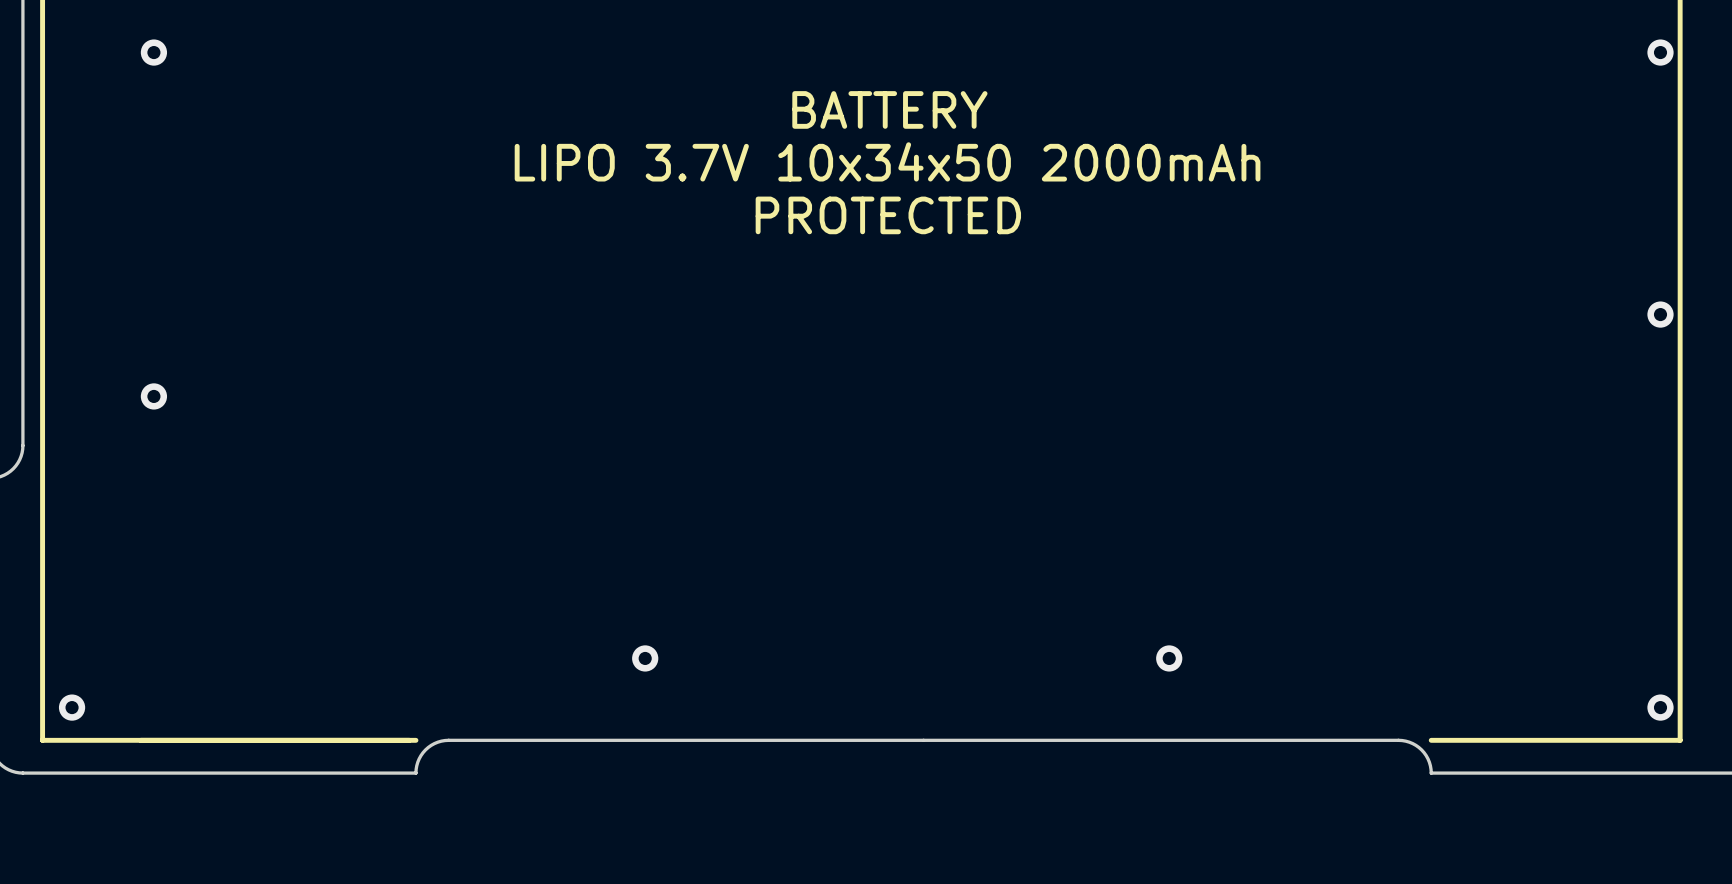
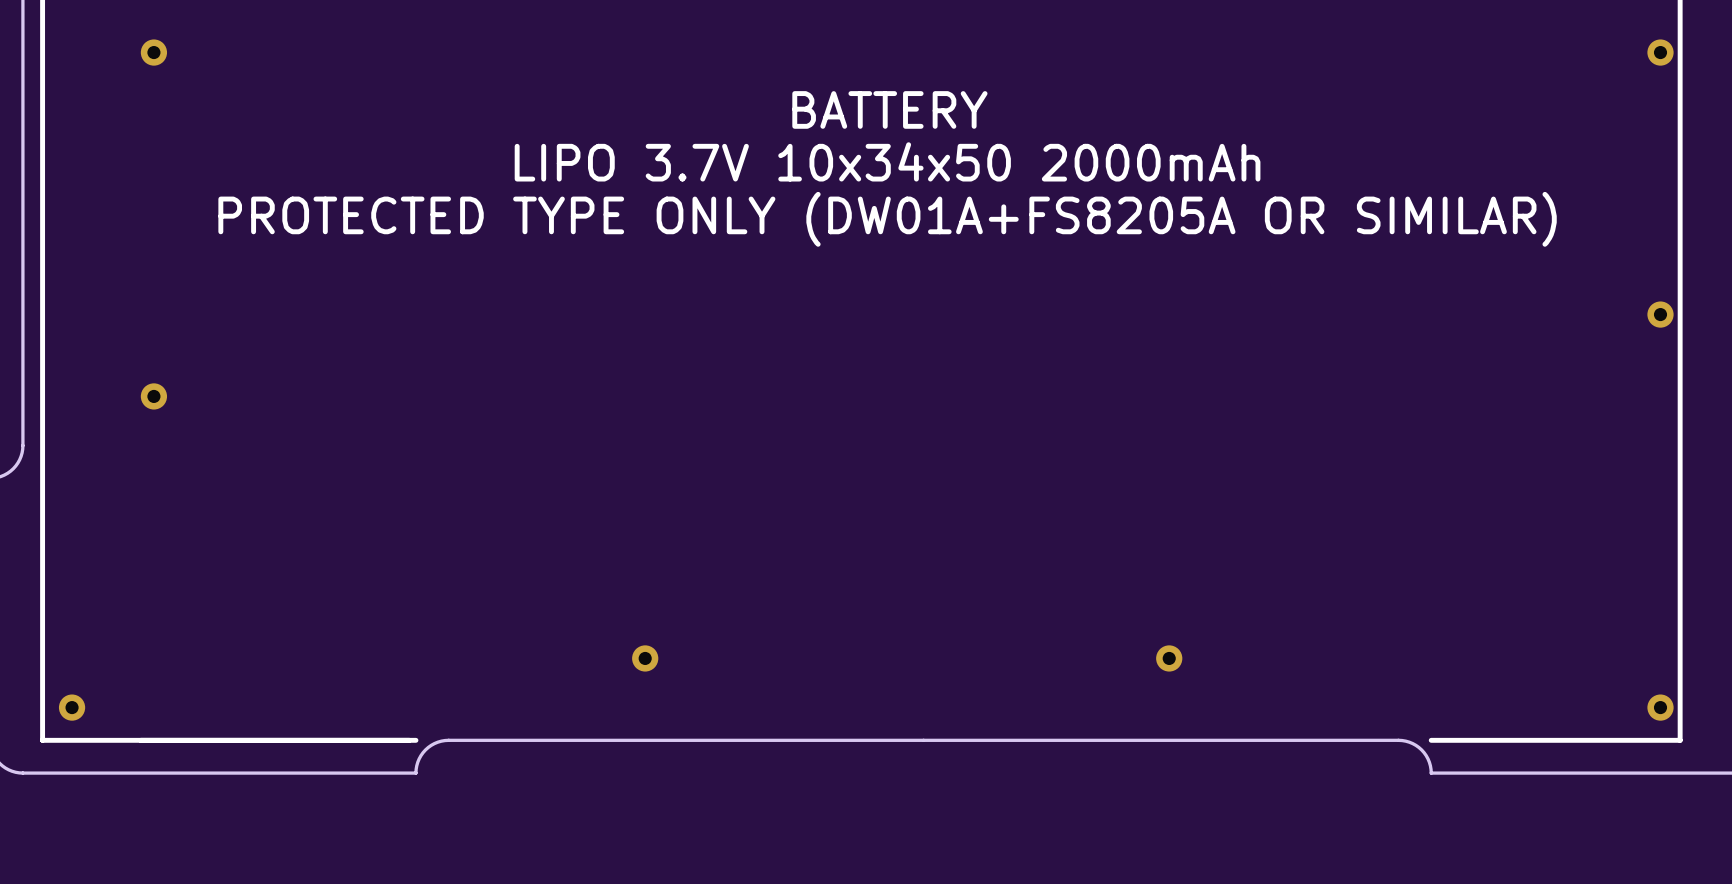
text: PROTECTED (888, 215) -> PROTECTED TYPE ONLY (DW01A+FS8205A OR SIMILAR) (887, 219)

